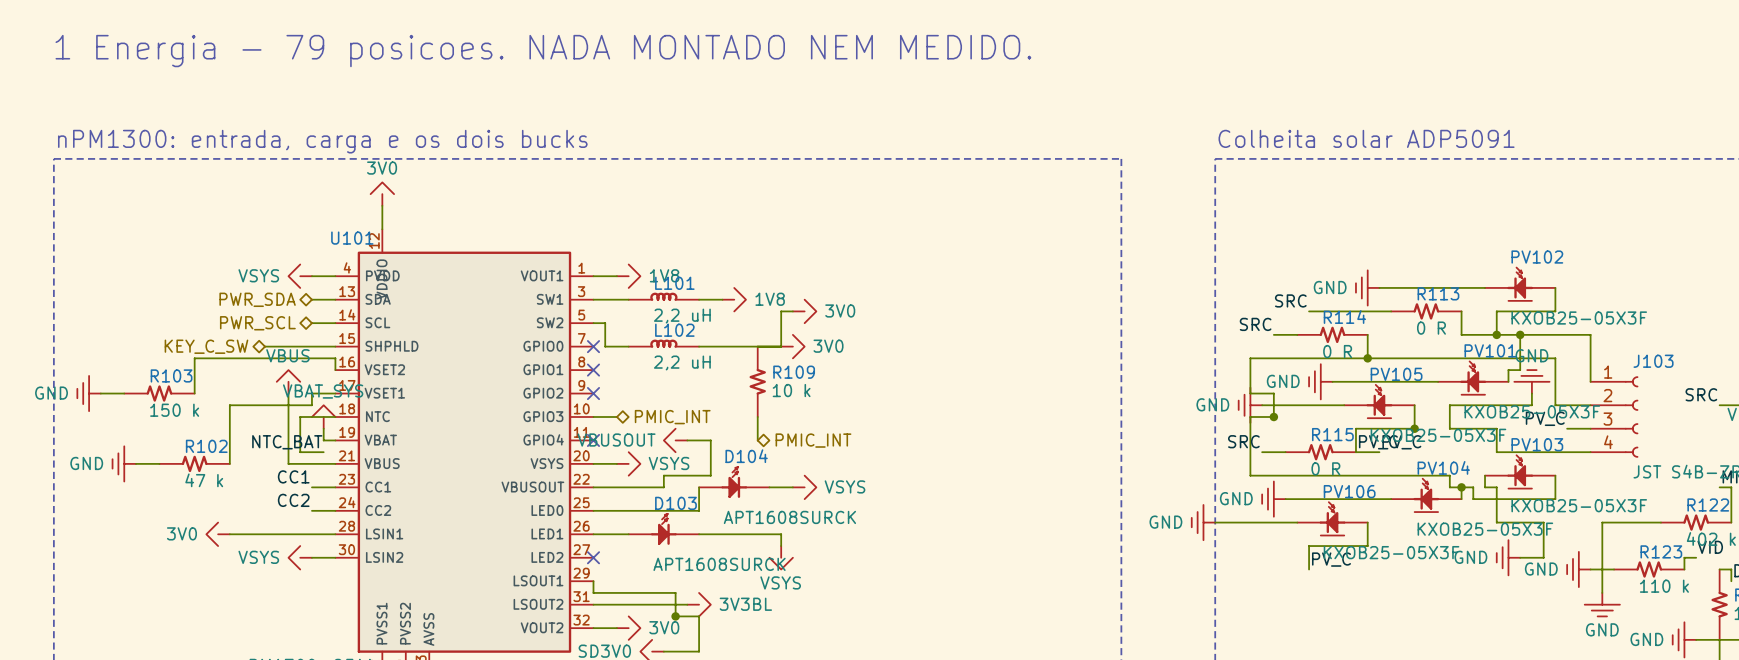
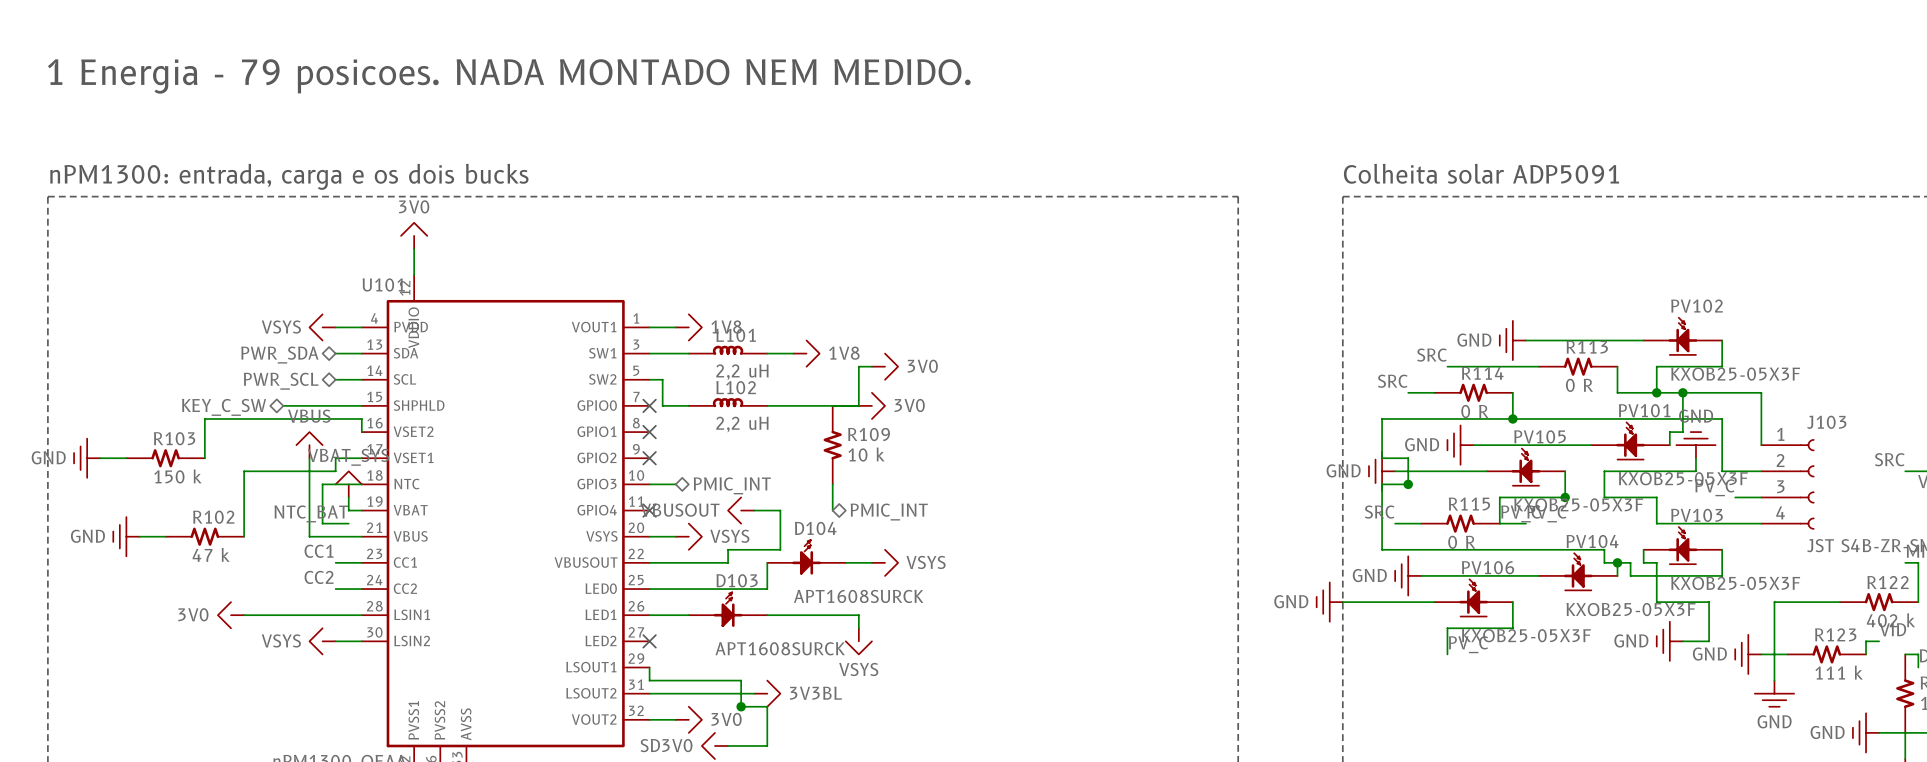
R123 value: 110 k (1664, 586) -> 111 k (1839, 672)

